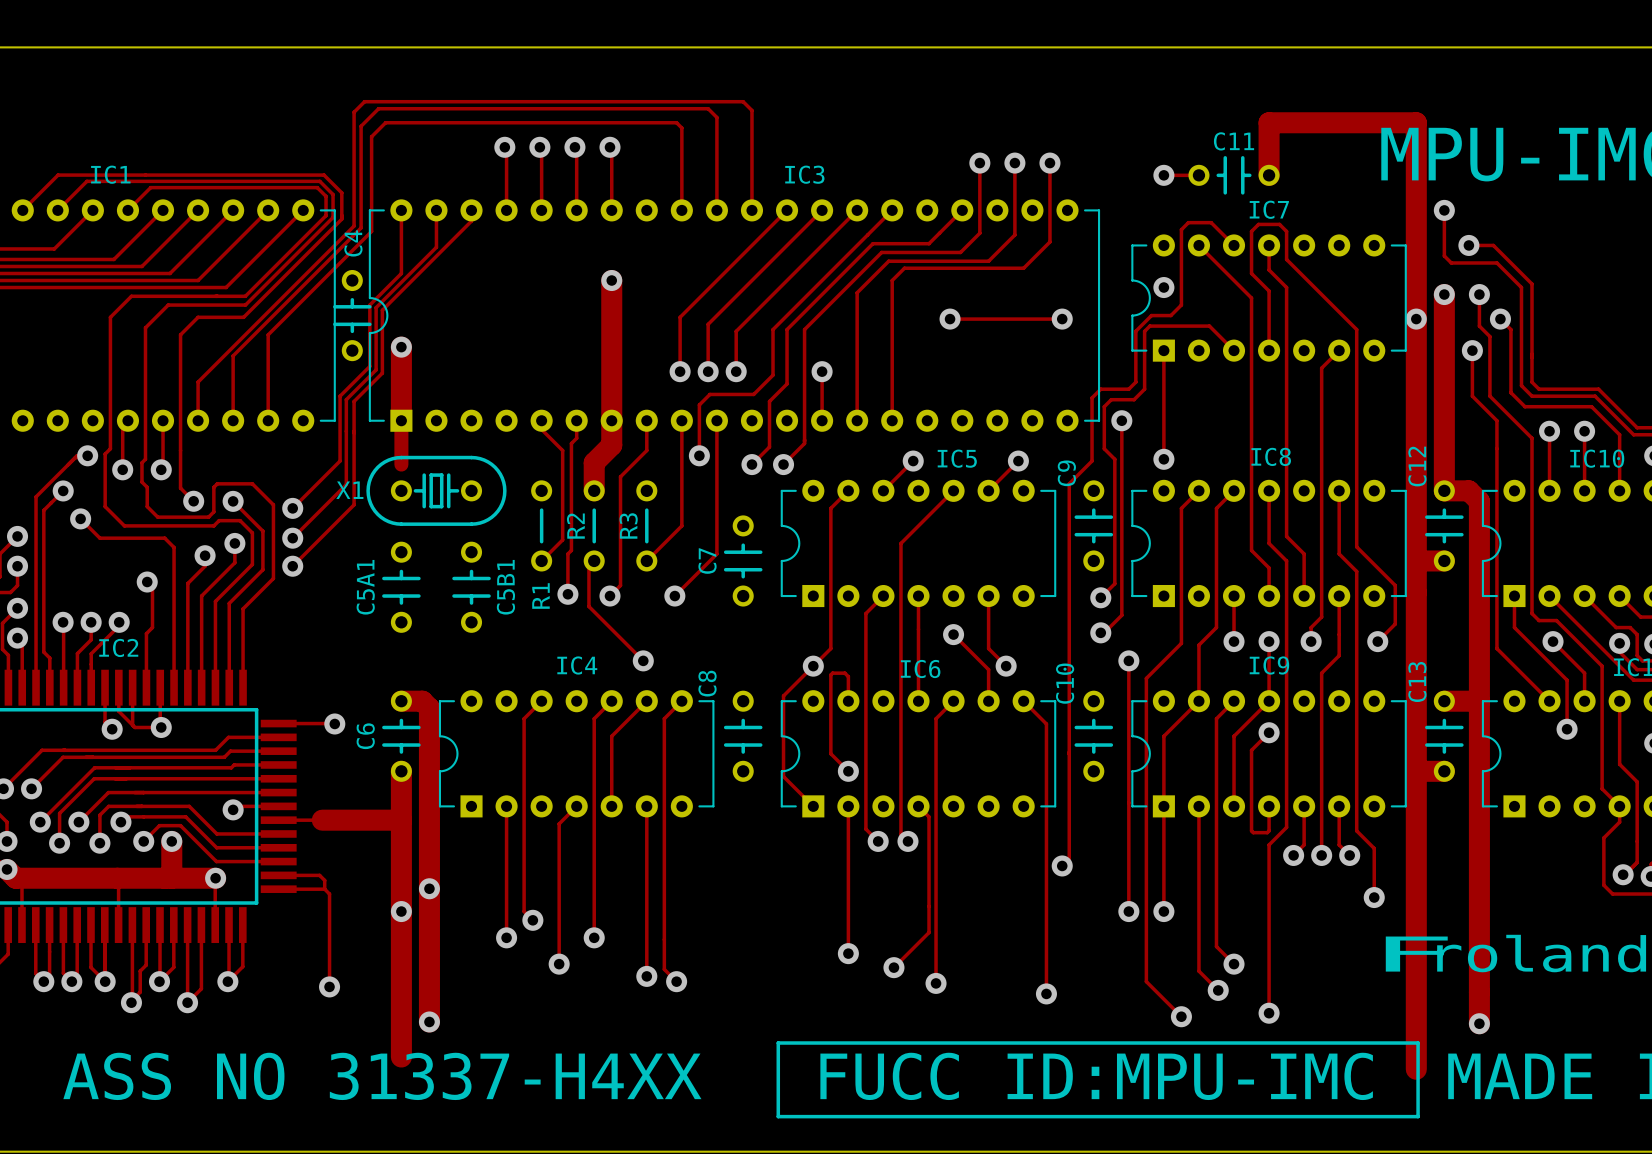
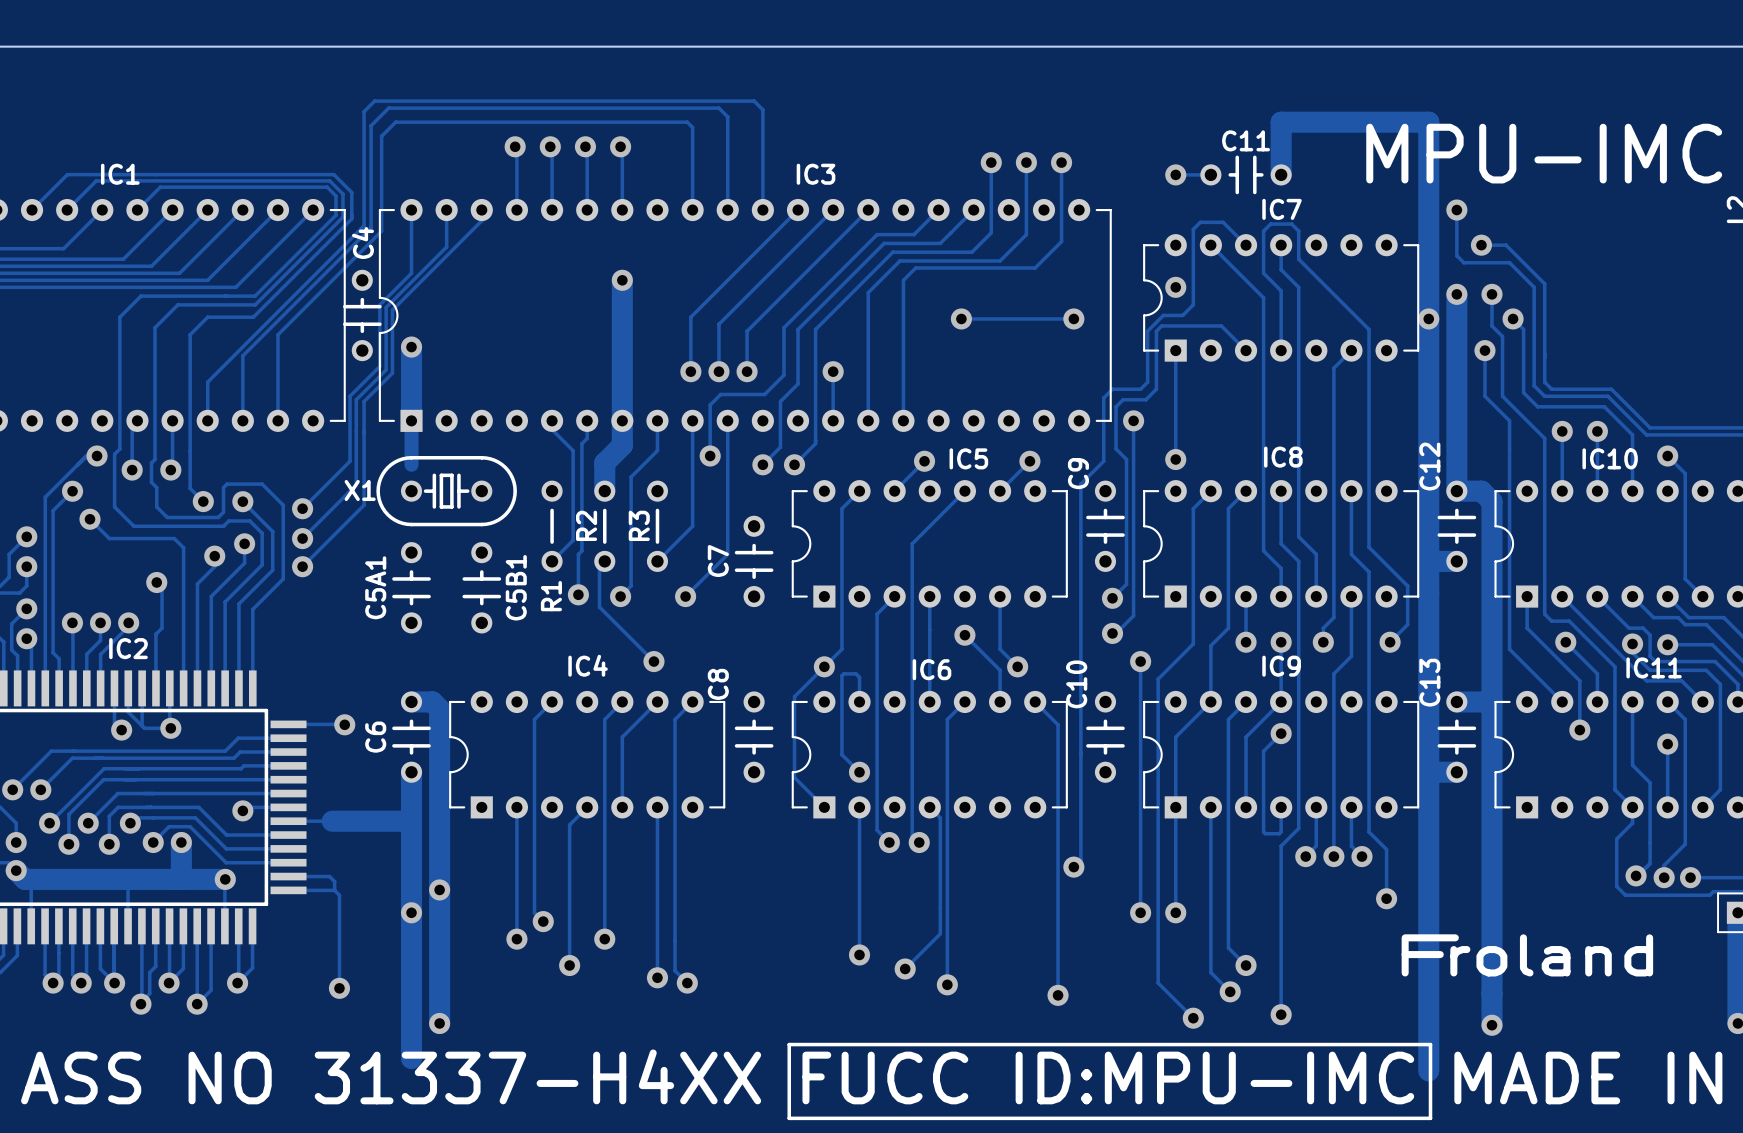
track: (892, 210) (773, 329) -> (938, 210) (913, 234) (877, 234) (783, 329)

